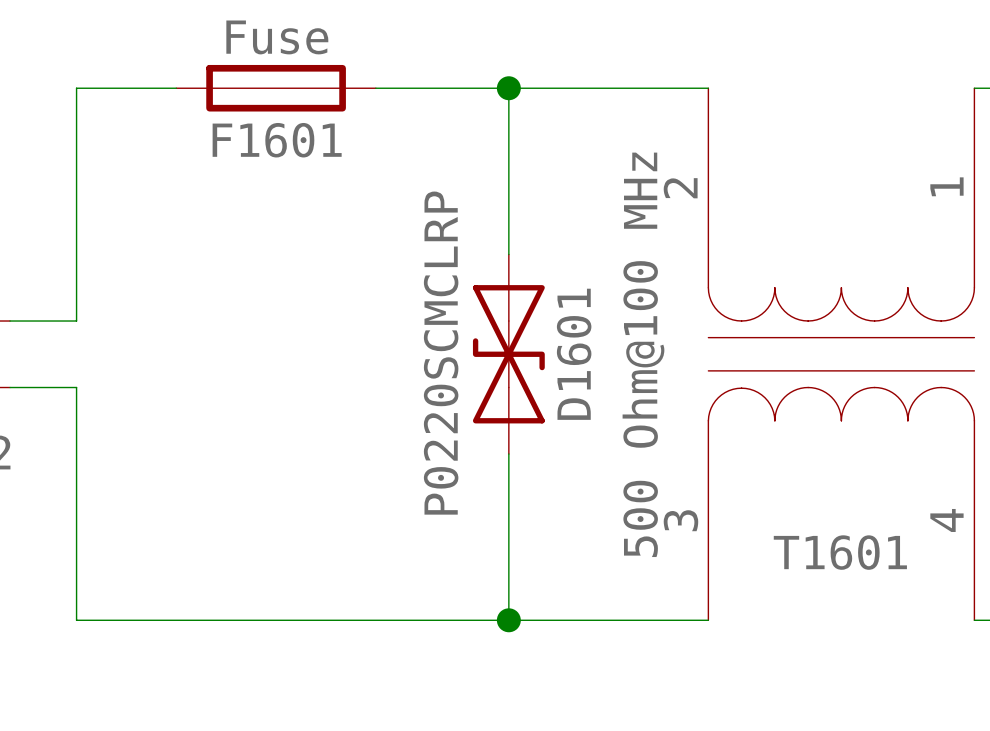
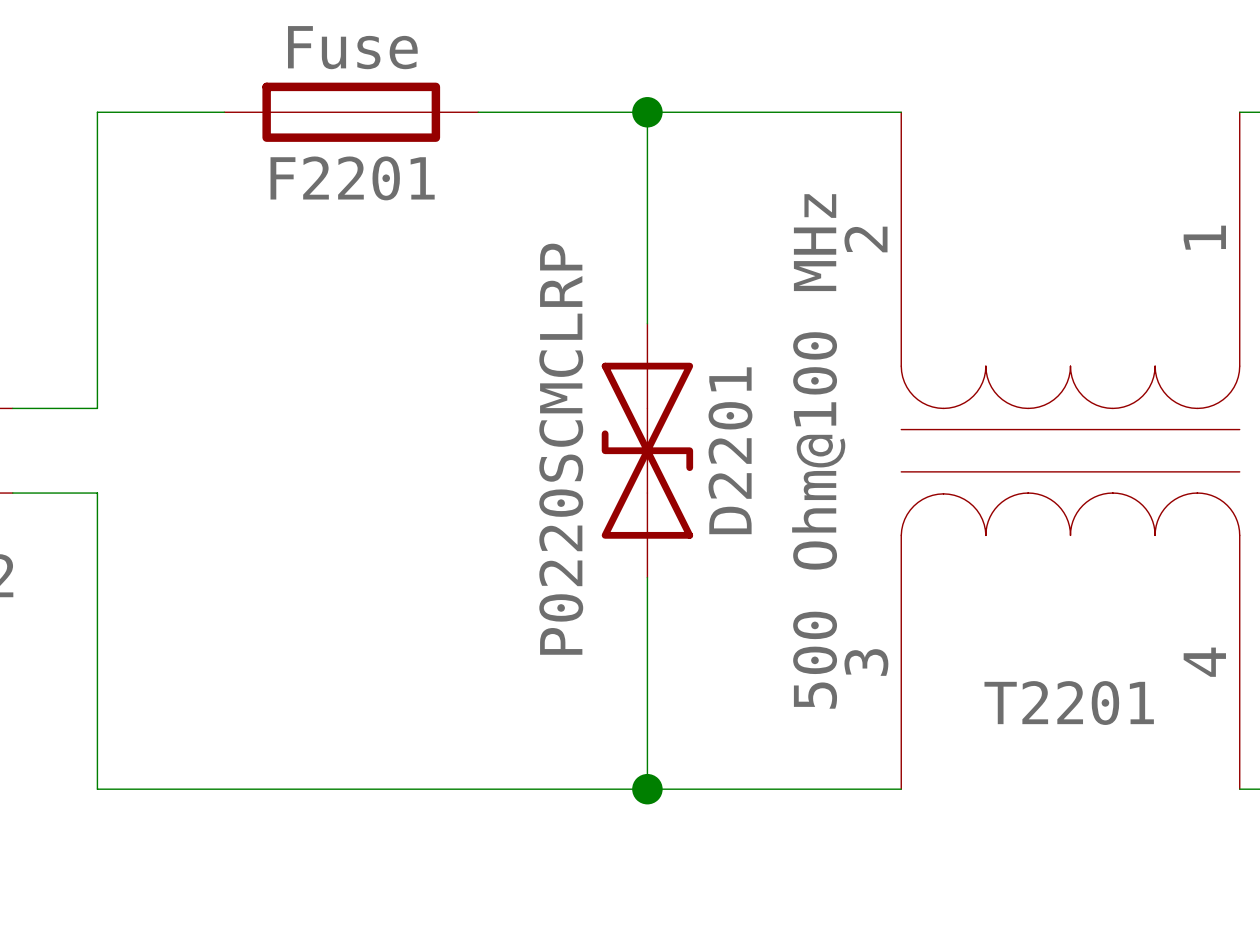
F1601 name: F1601 (277, 140) -> F2201 (352, 178)
D1601 name: D1601 (574, 354) -> D2201 (730, 450)
T1601 name: T1601 (840, 552) -> T2201 (1069, 703)

